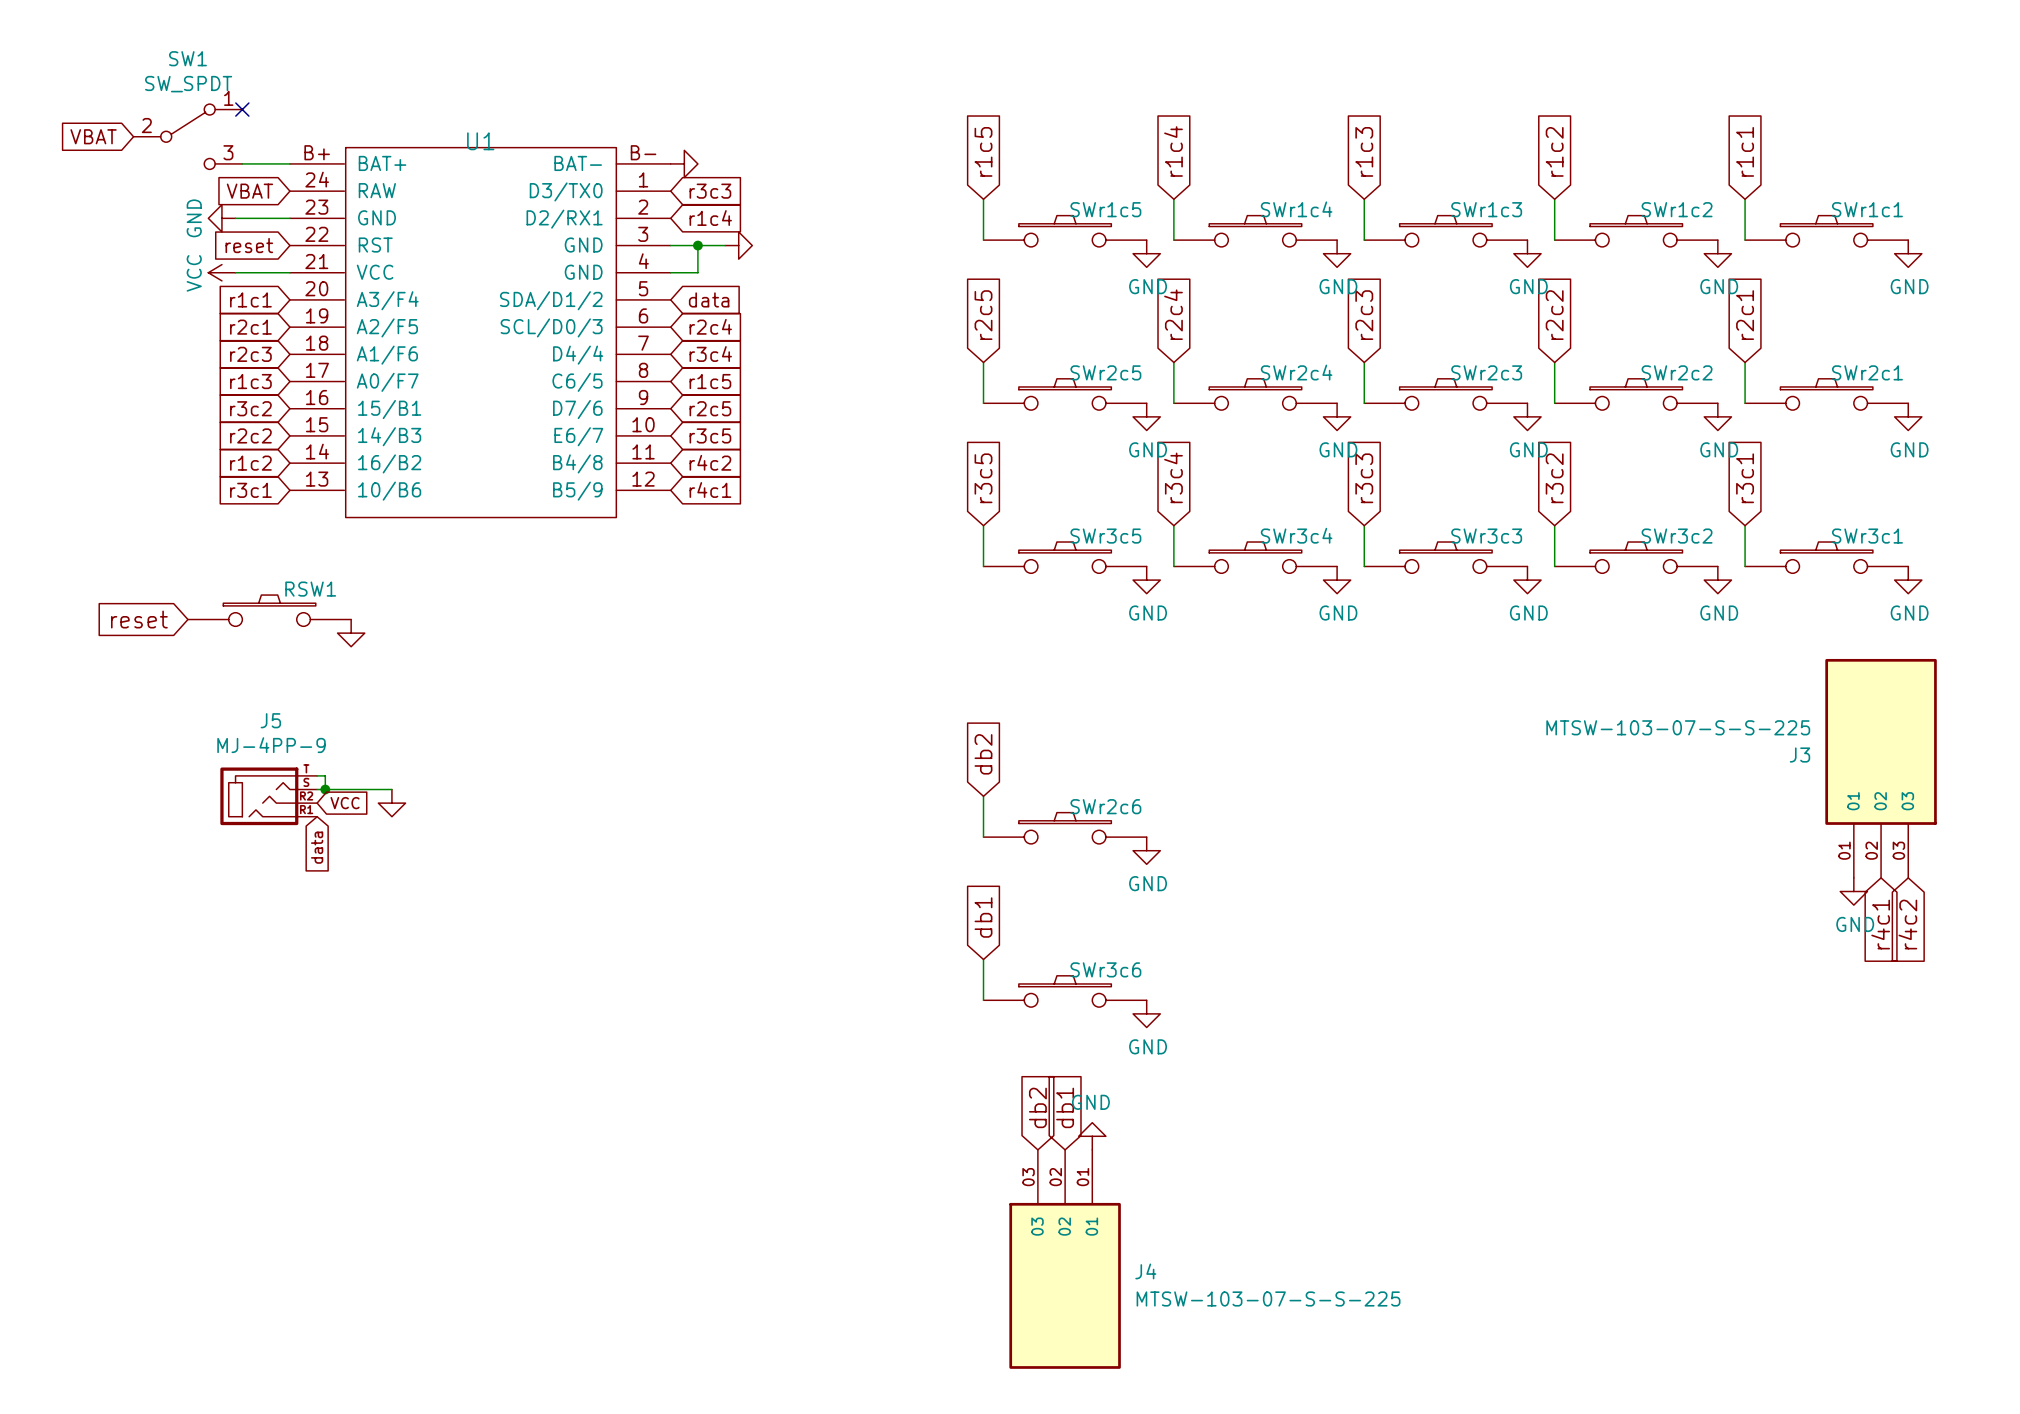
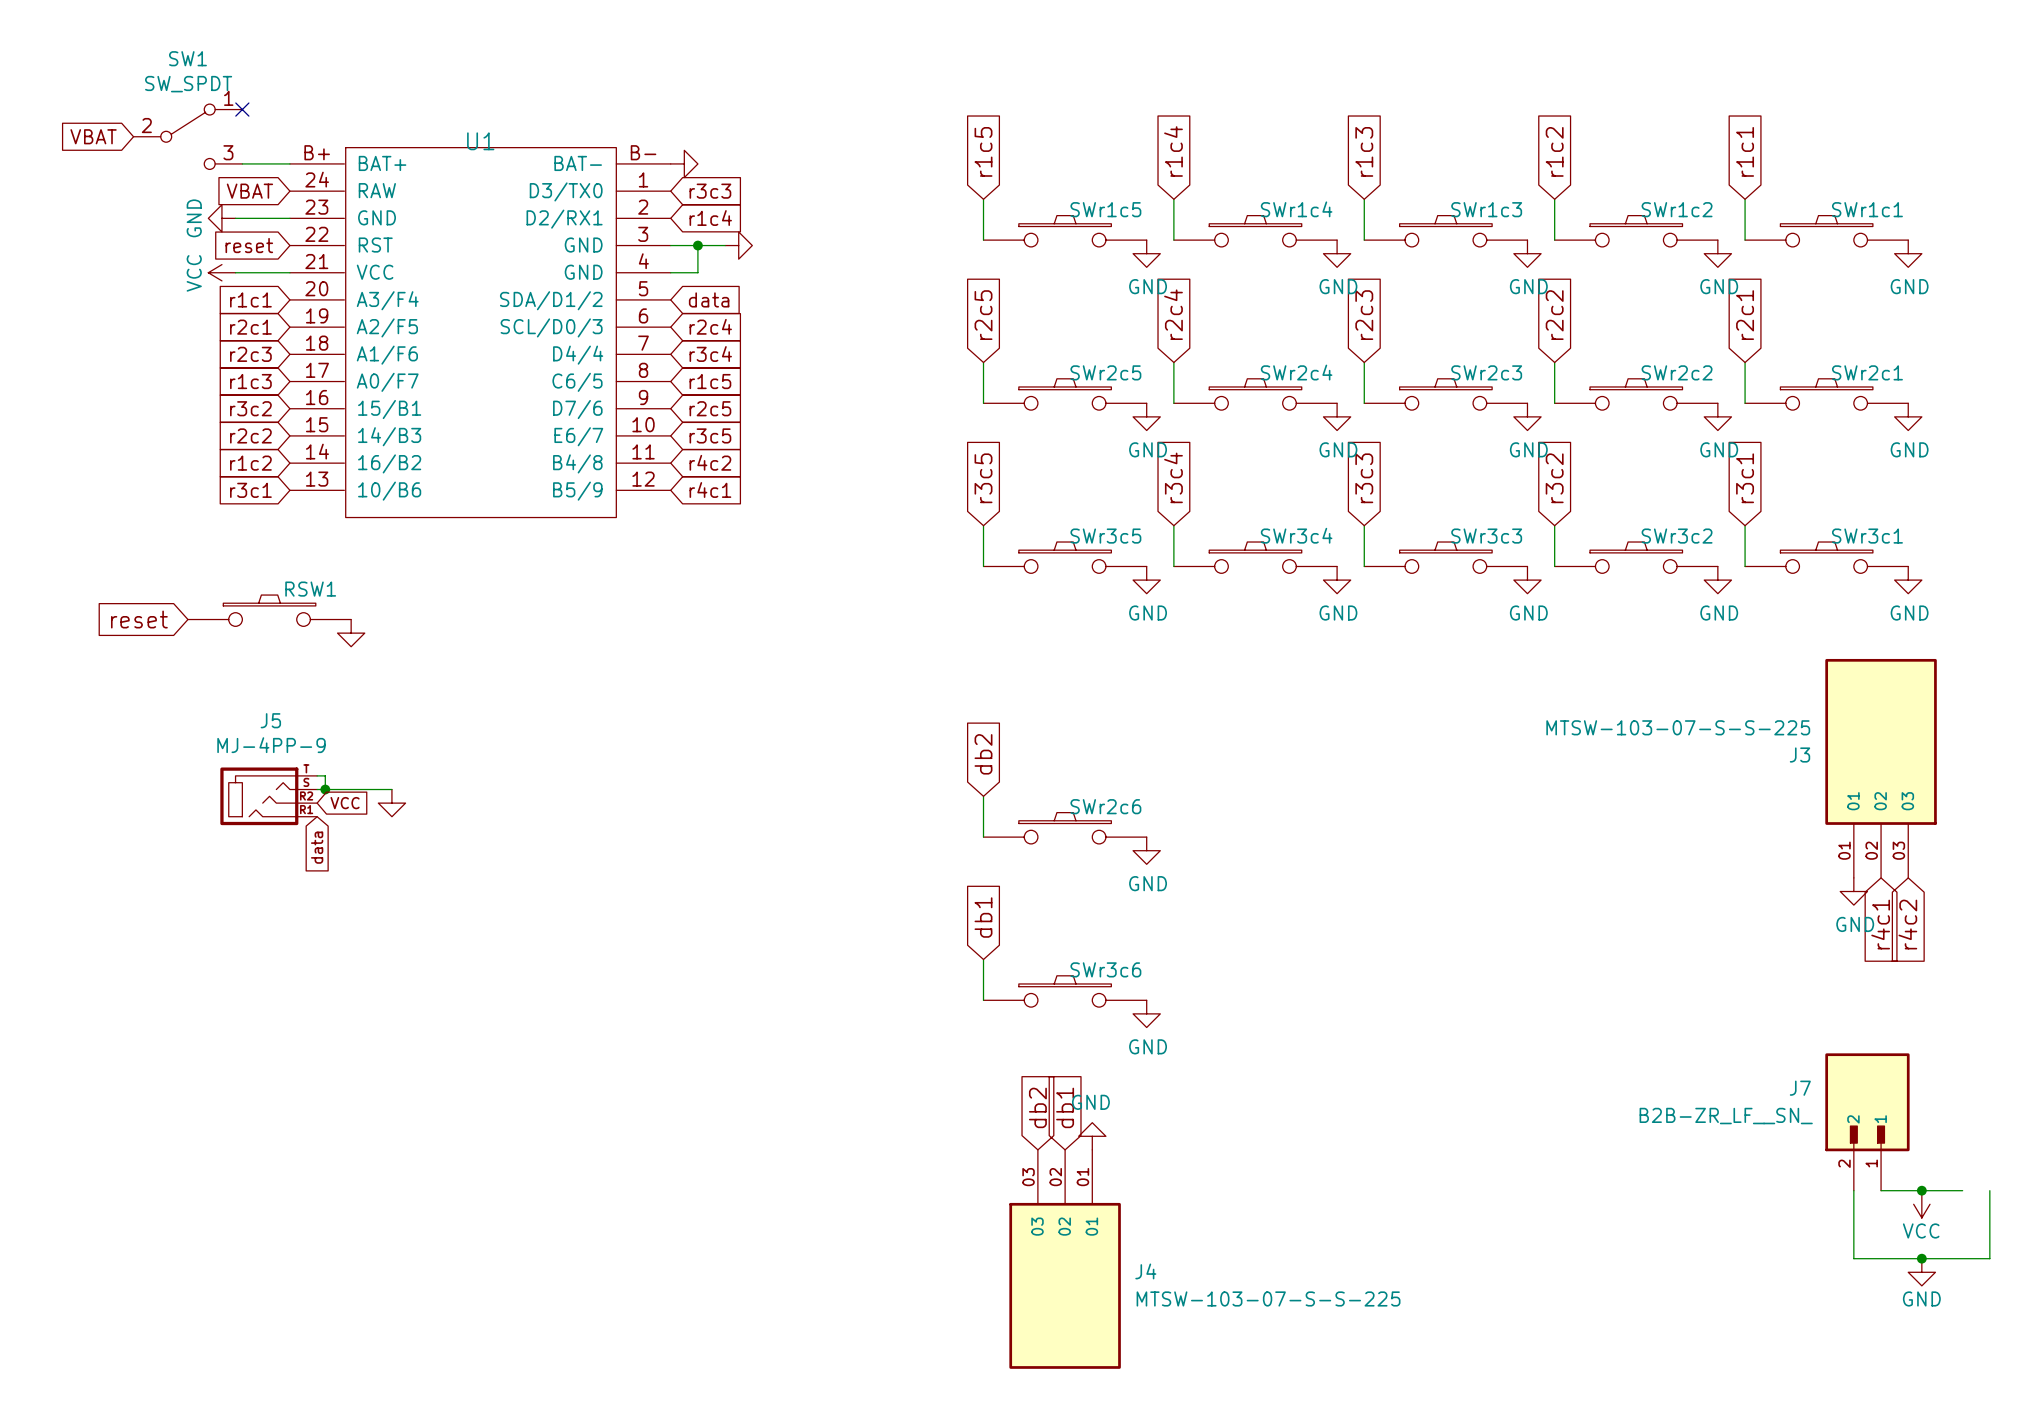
J7: none -> B2B-ZR_LF__SN_ (1867, 1122)
wire: none -> (1853, 1190) (1853, 1258) (1989, 1258) (1989, 1190)
wire: none -> (1881, 1190) (1962, 1190)
junction: none -> (1921, 1190)
power symbol: none -> VCC (1921, 1204)
junction: none -> (1921, 1258)
power symbol: none -> GND (1921, 1272)

